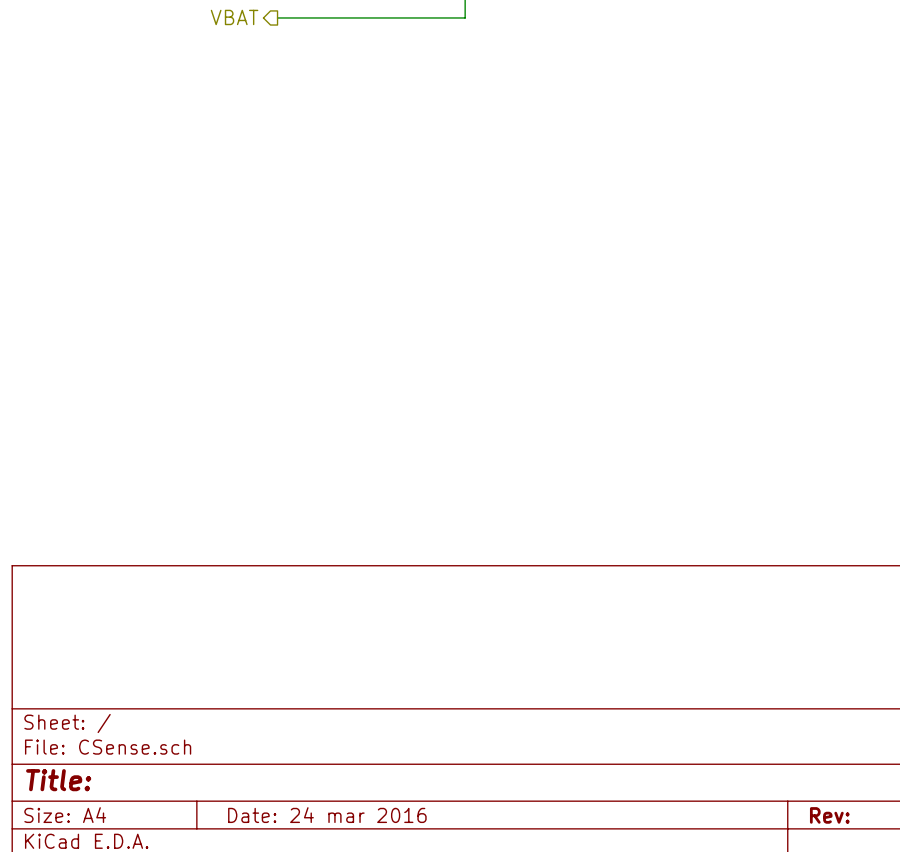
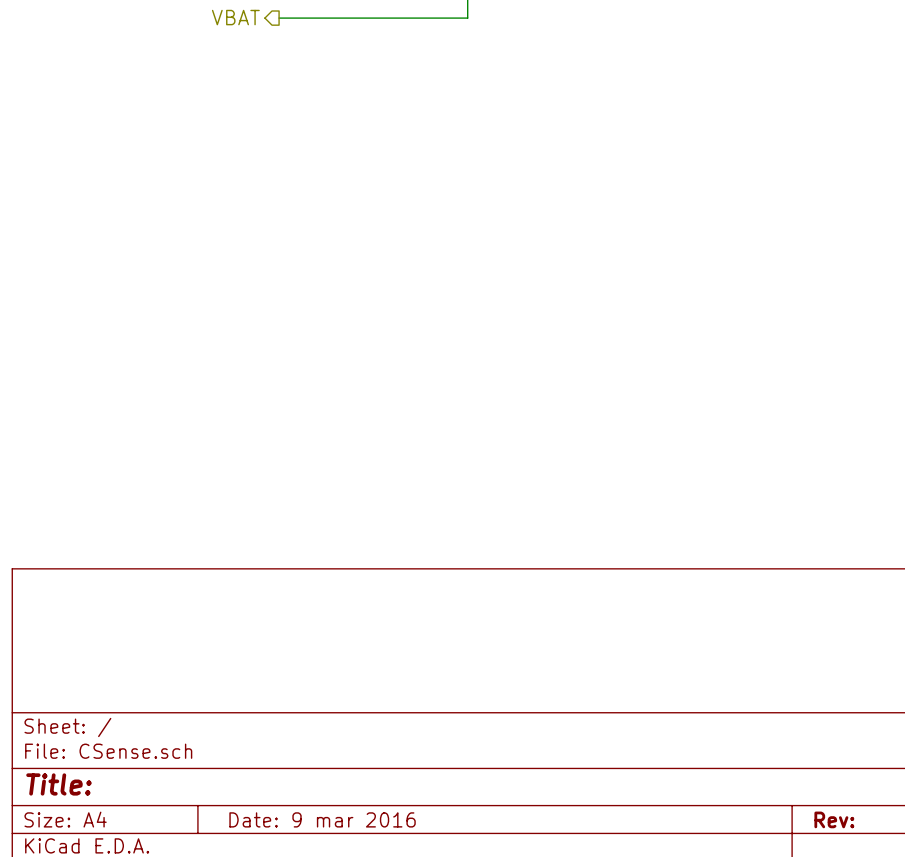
title block: Date: 24 mar 2016 (327, 815) -> Date: 9 mar 2016 (322, 819)

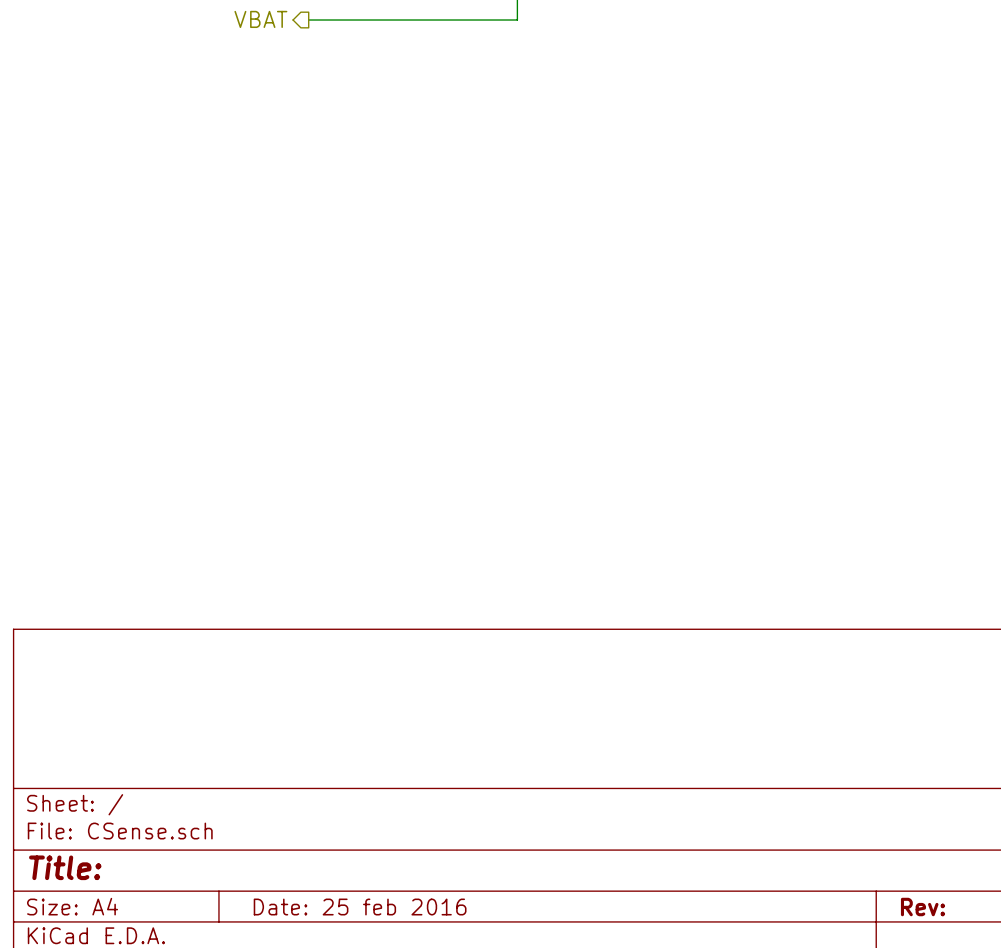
title block: Date: 9 mar 2016 (322, 819) -> Date: 25 feb 2016 (360, 907)

